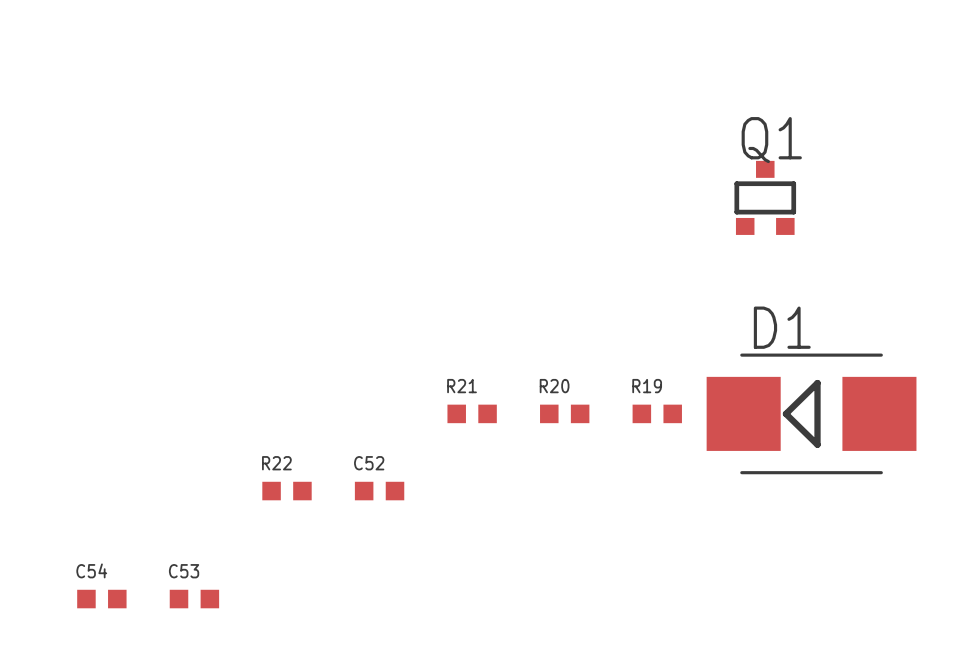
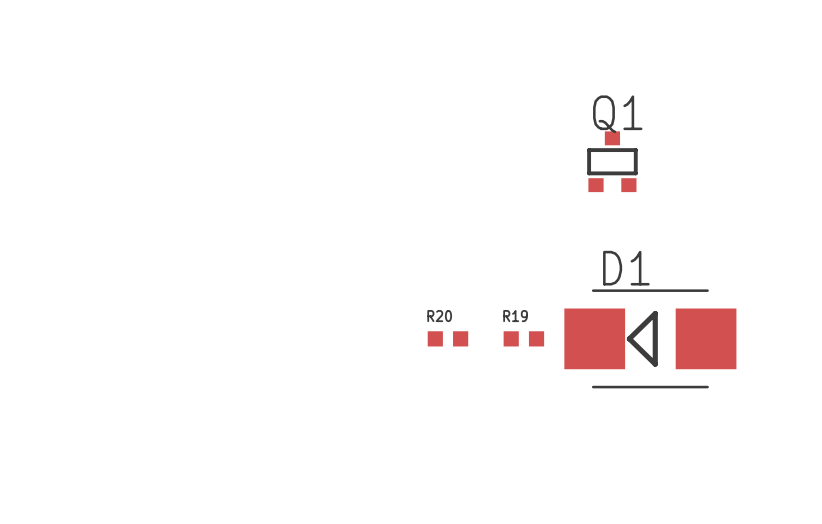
R21: (472, 413) -> none
R22: (287, 491) -> none
C52: (379, 491) -> none
C54: (101, 599) -> none
C53: (194, 599) -> none

